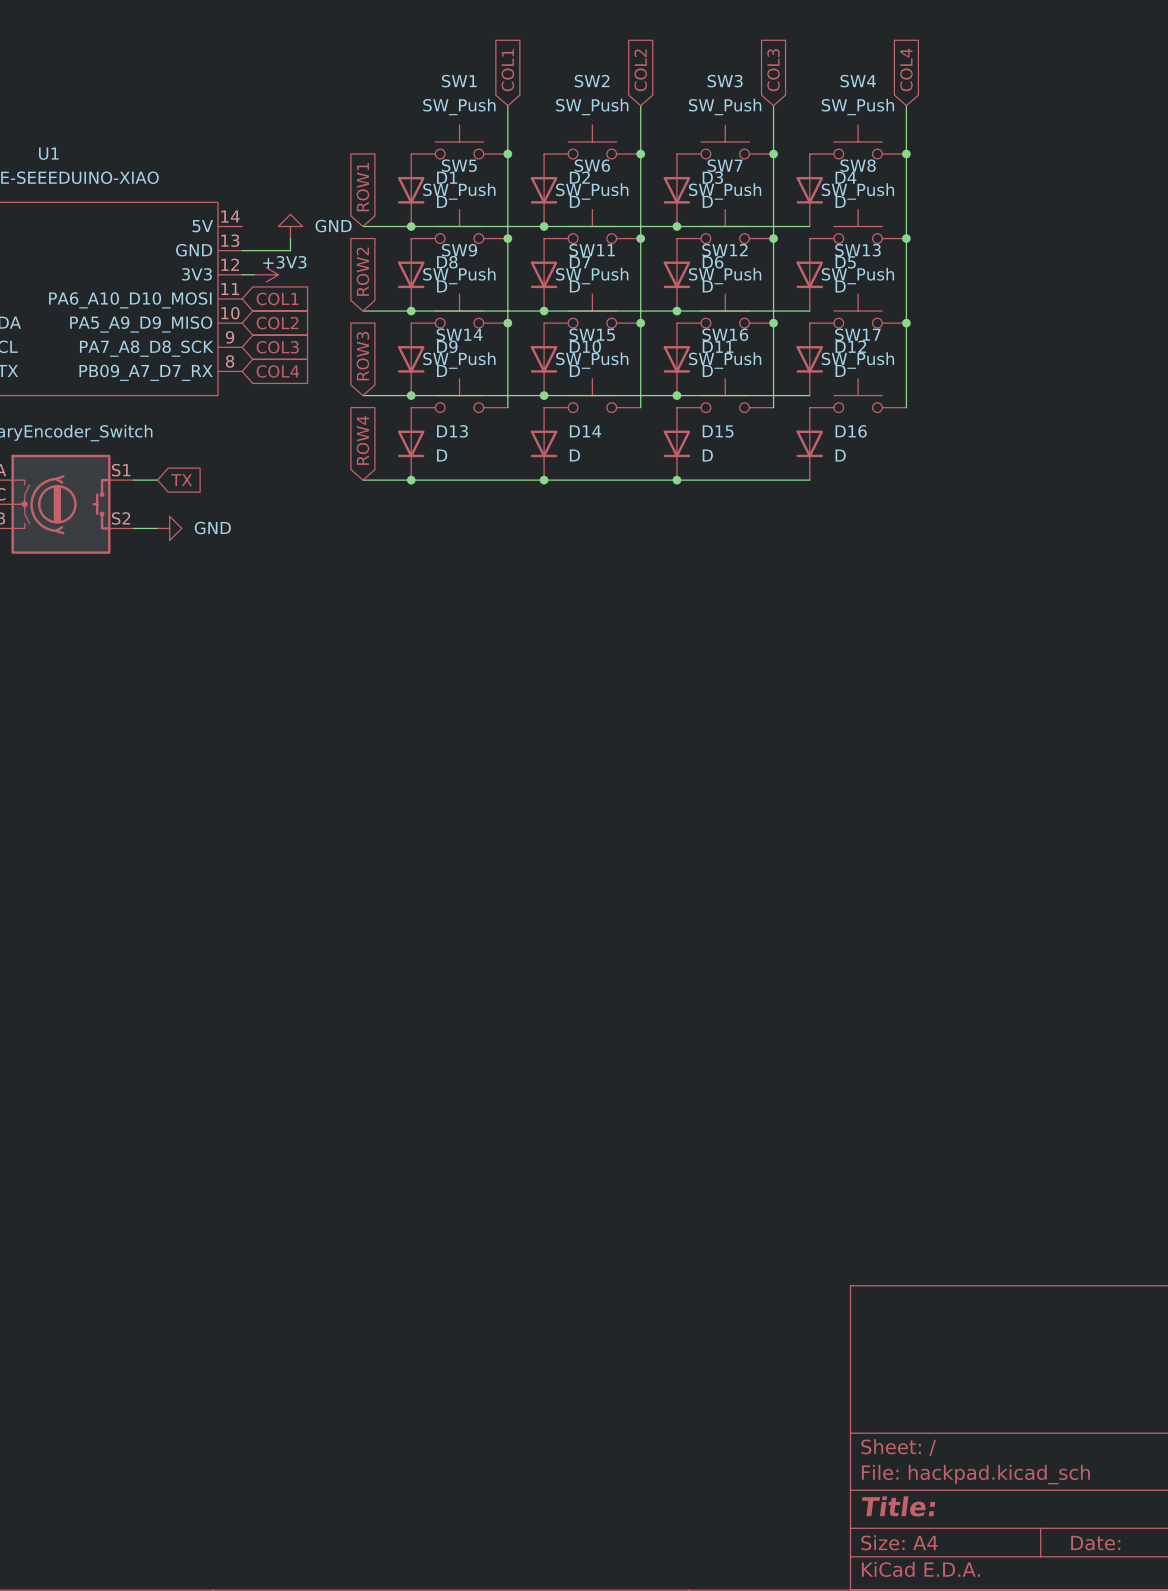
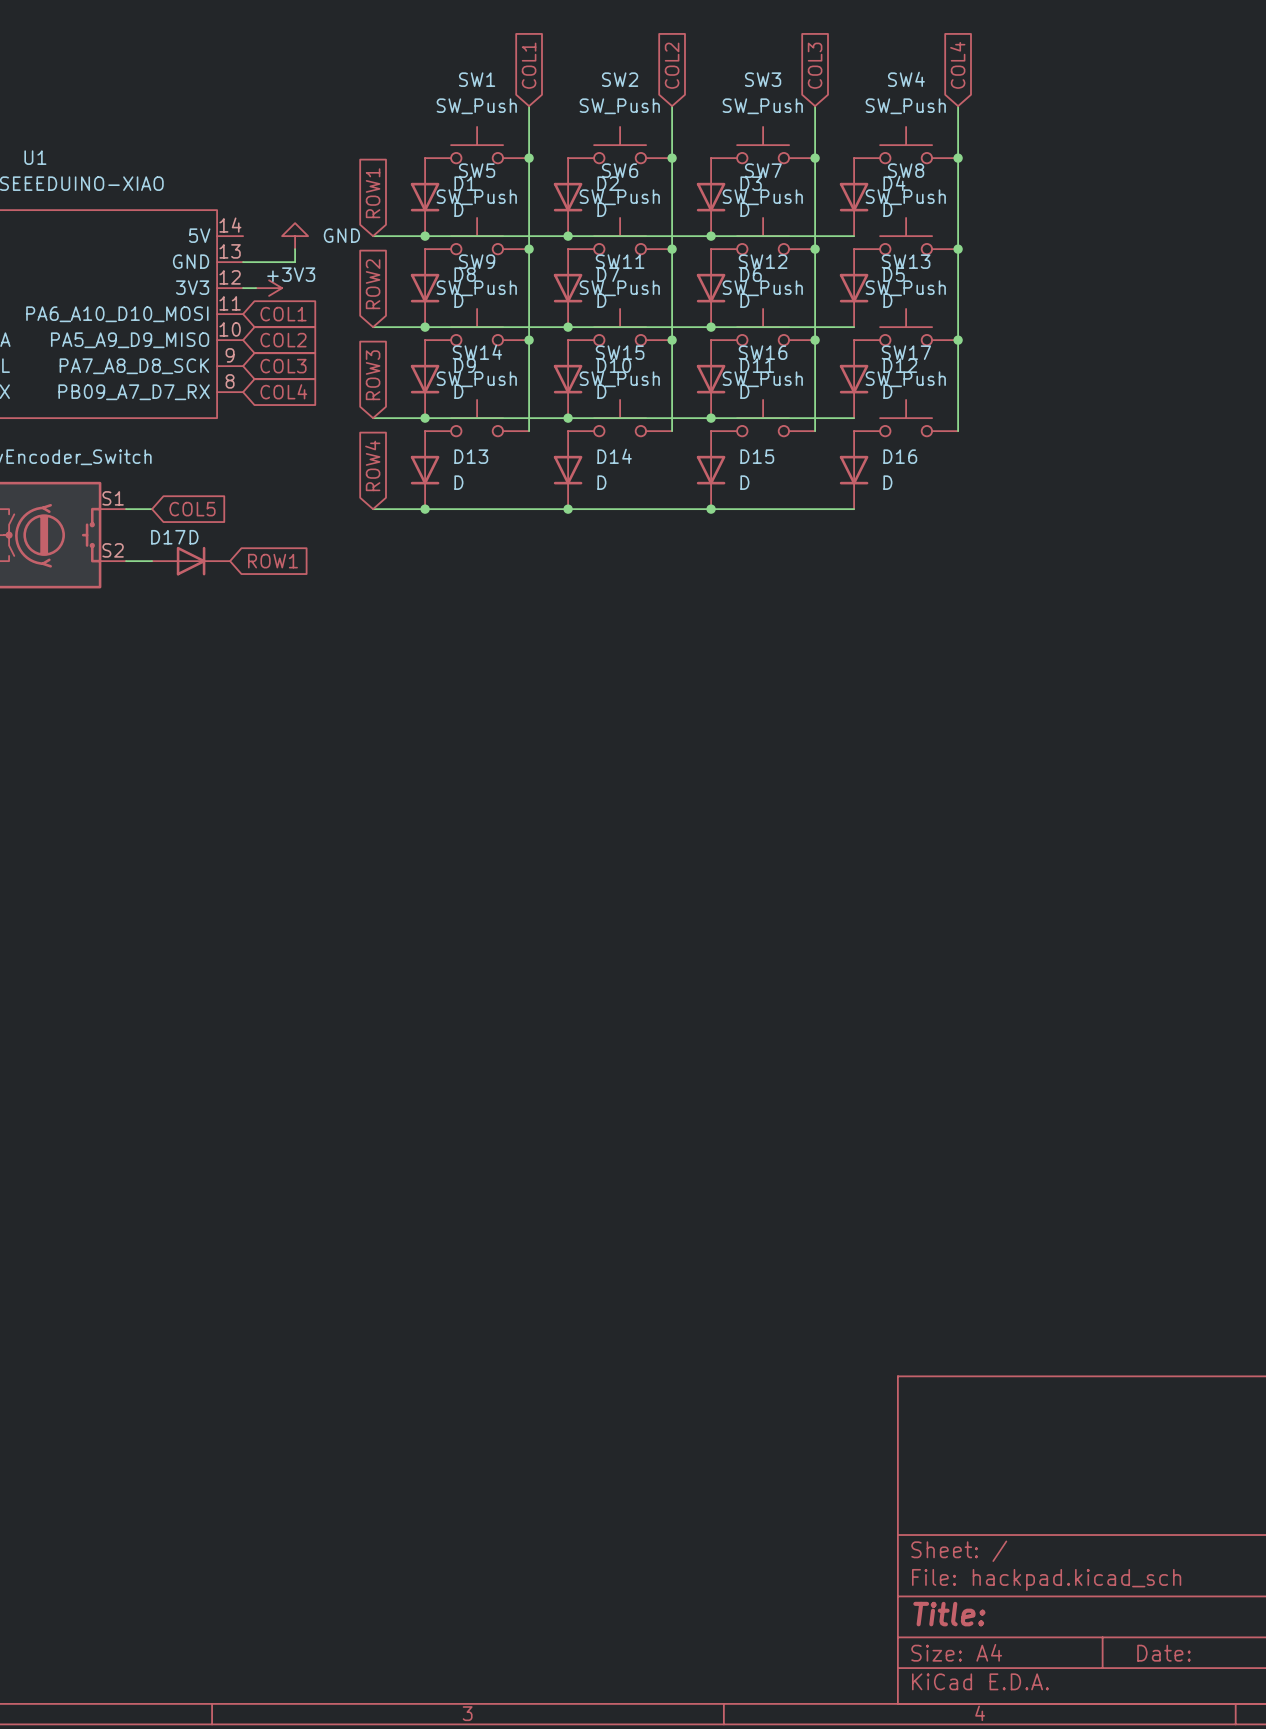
global label: TX (181, 480) -> COL5 (192, 509)
power symbol: GND (169, 528) -> none
D17: none -> D (191, 561)
global label: none -> ROW1 (272, 561)

